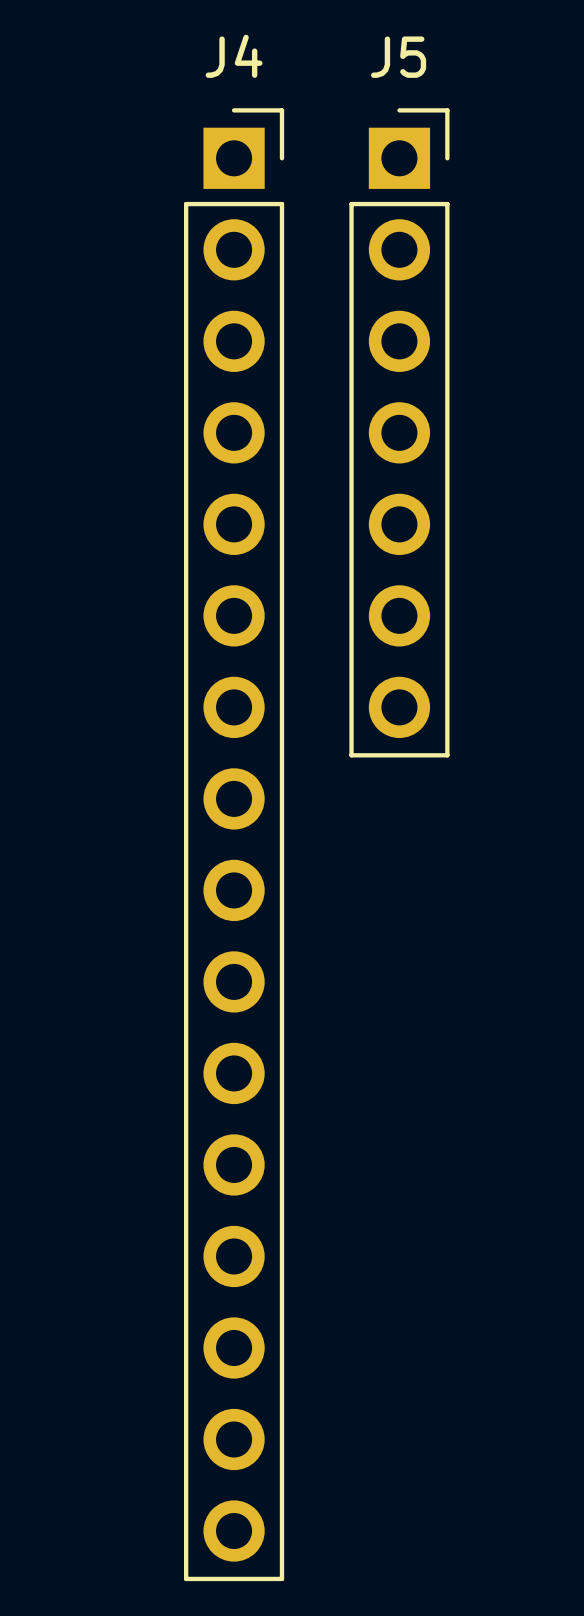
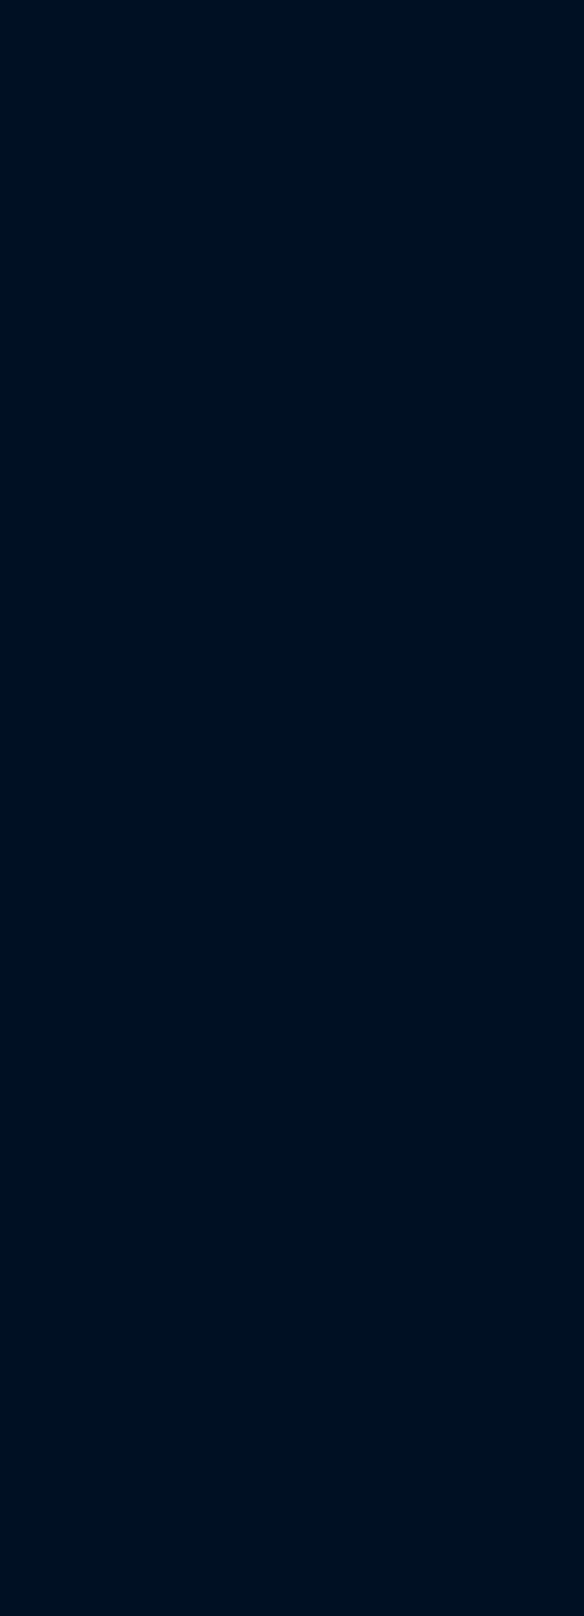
J5: (399, 432) -> none
J4: (234, 844) -> none

